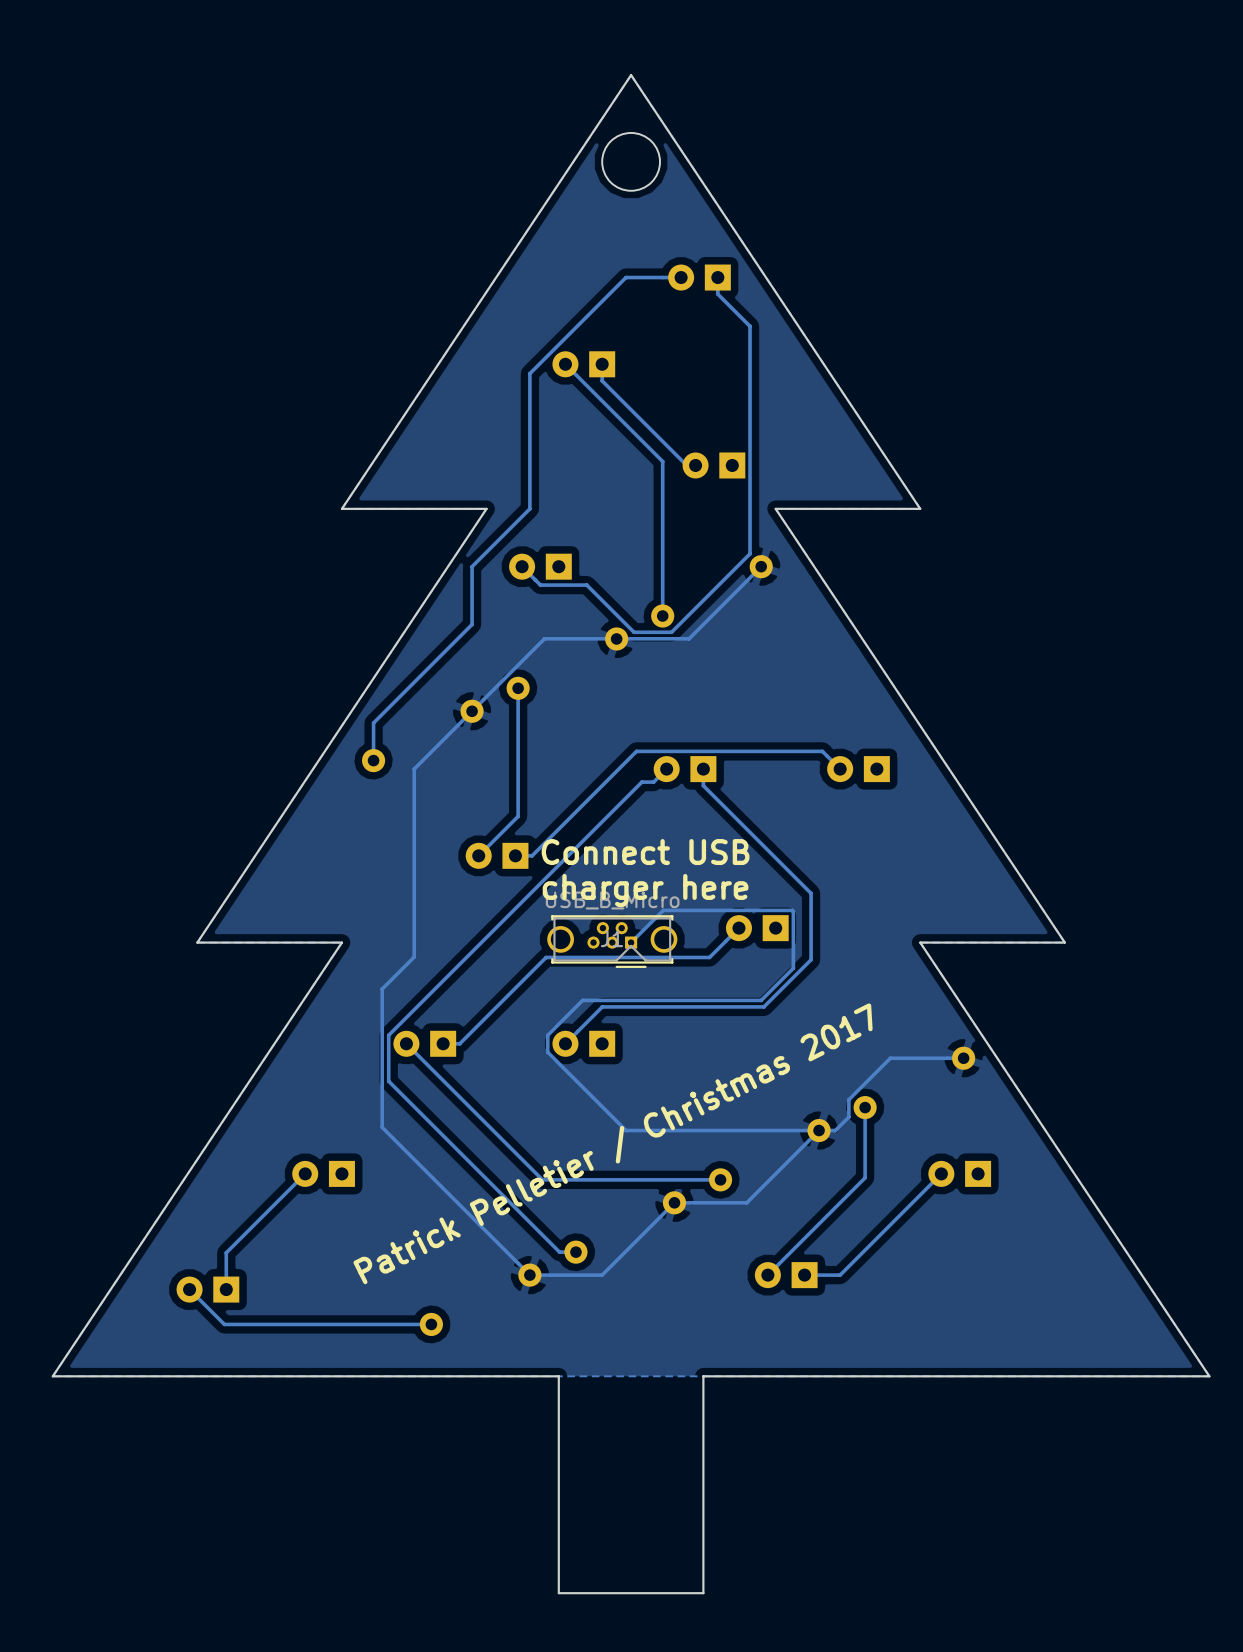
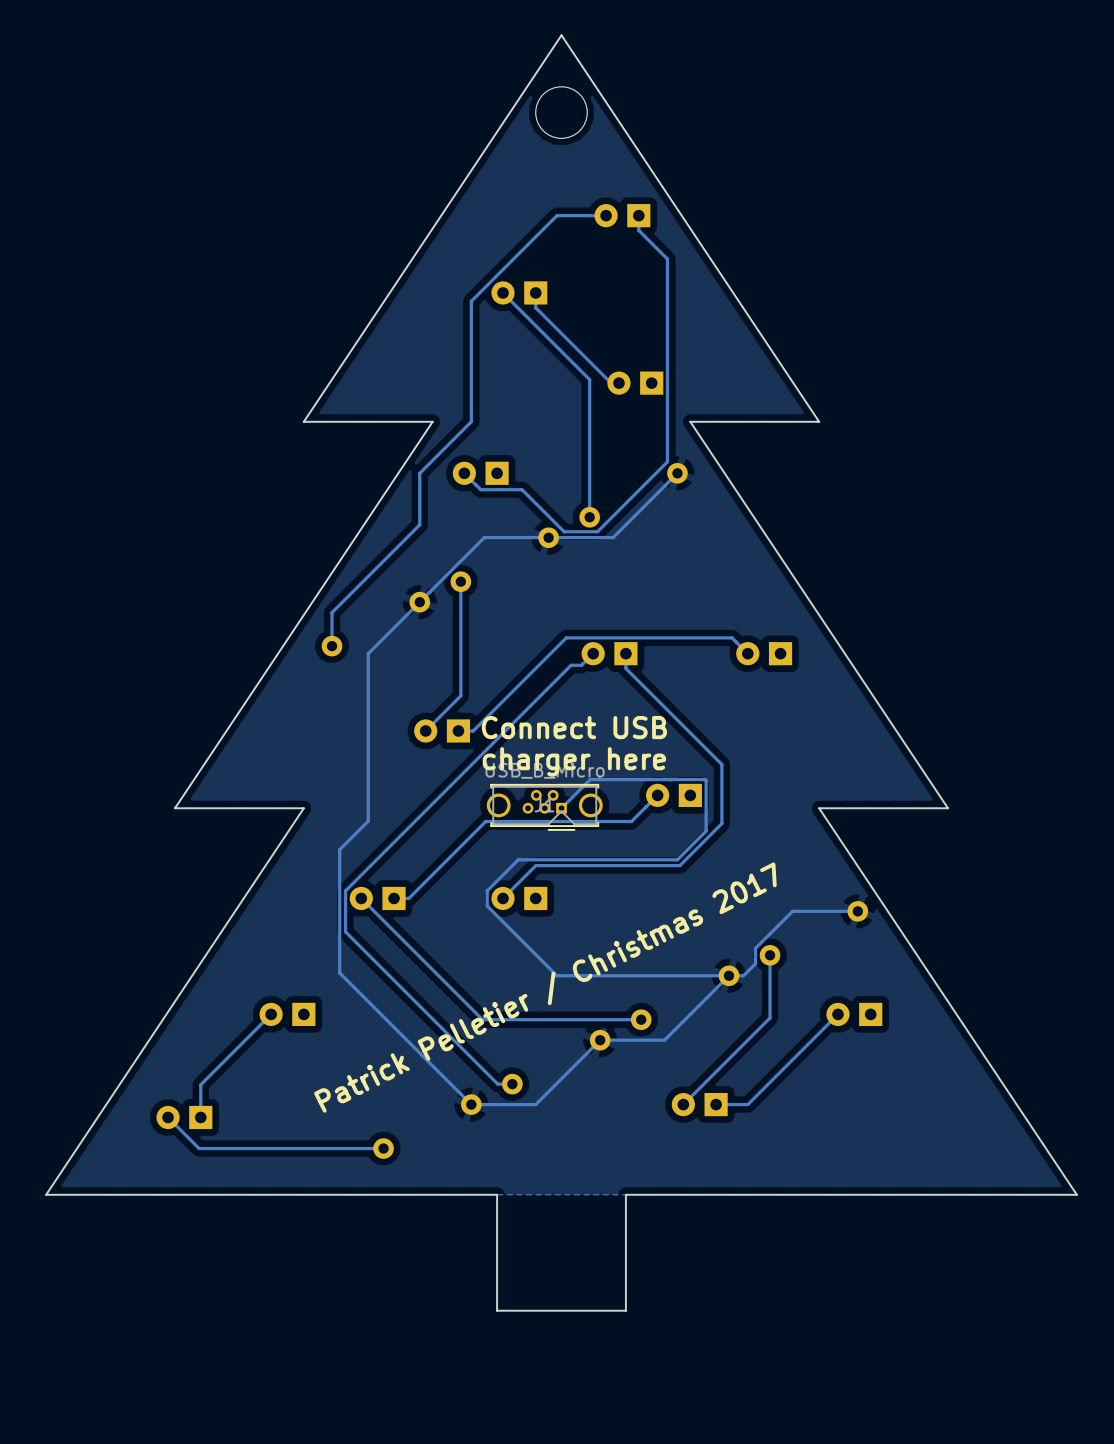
board edge: (703, 1506) (703, 1593) (558, 1593) (558, 1506) -> (625, 1310) (497, 1310)

